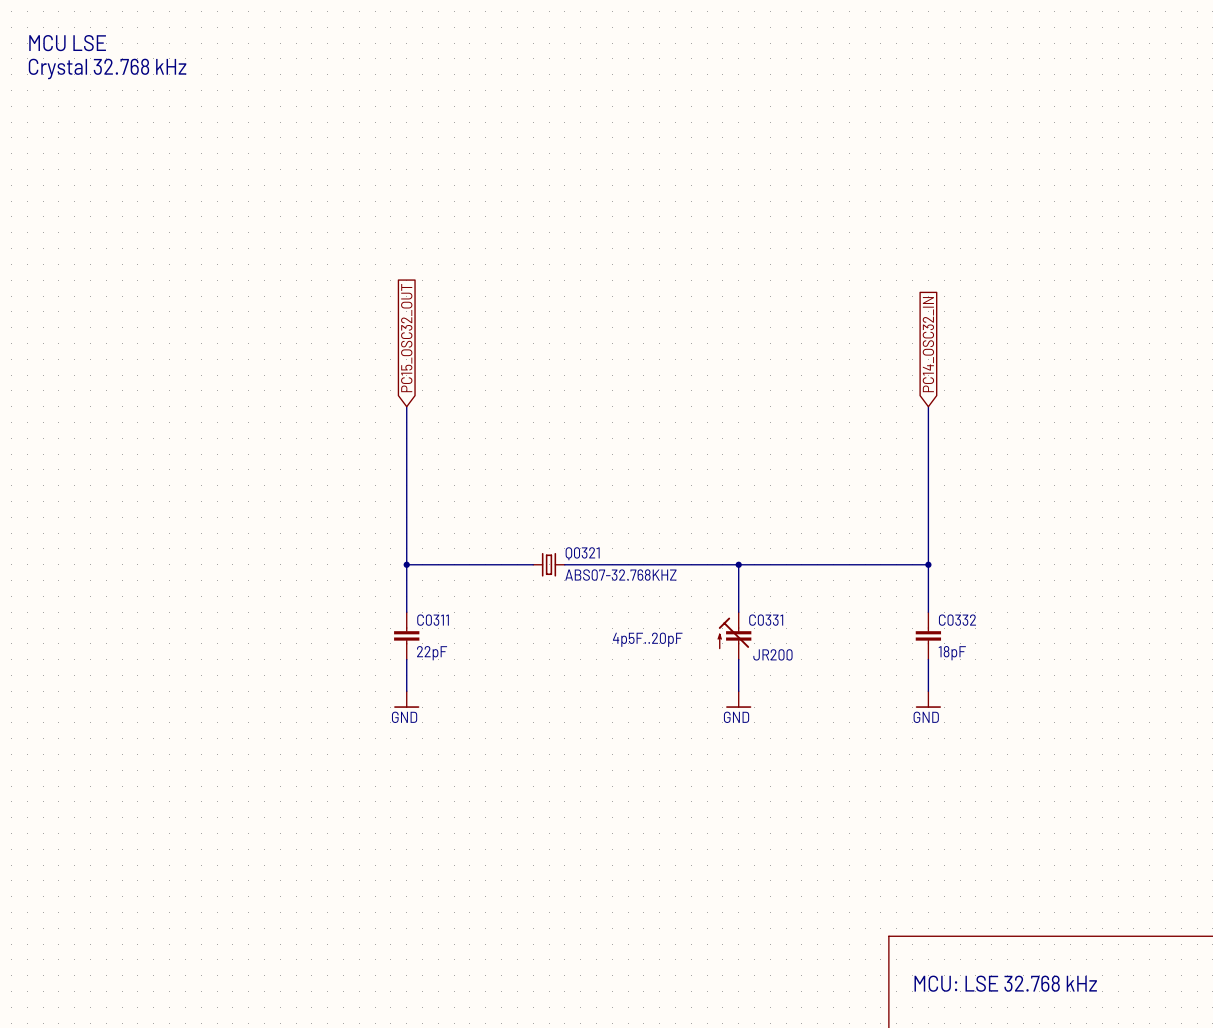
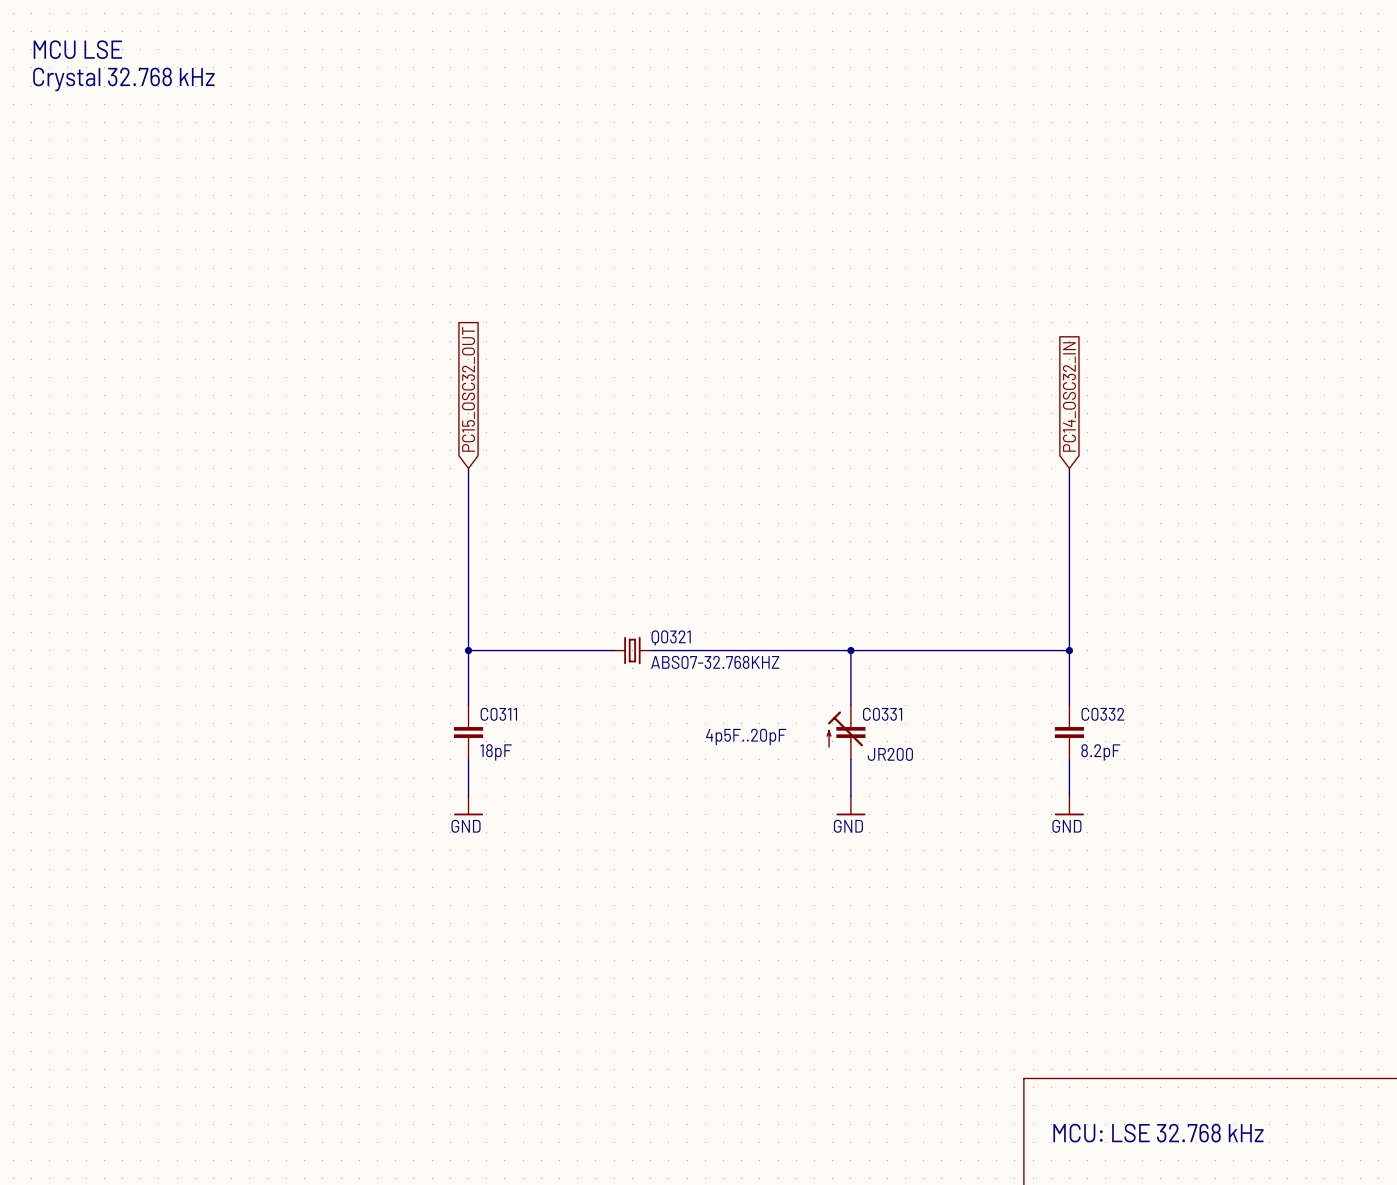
C0311 value: 22pF (432, 653) -> 18pF (496, 752)
C0332 value: 18pF (952, 653) -> 8.2pF (1100, 752)

